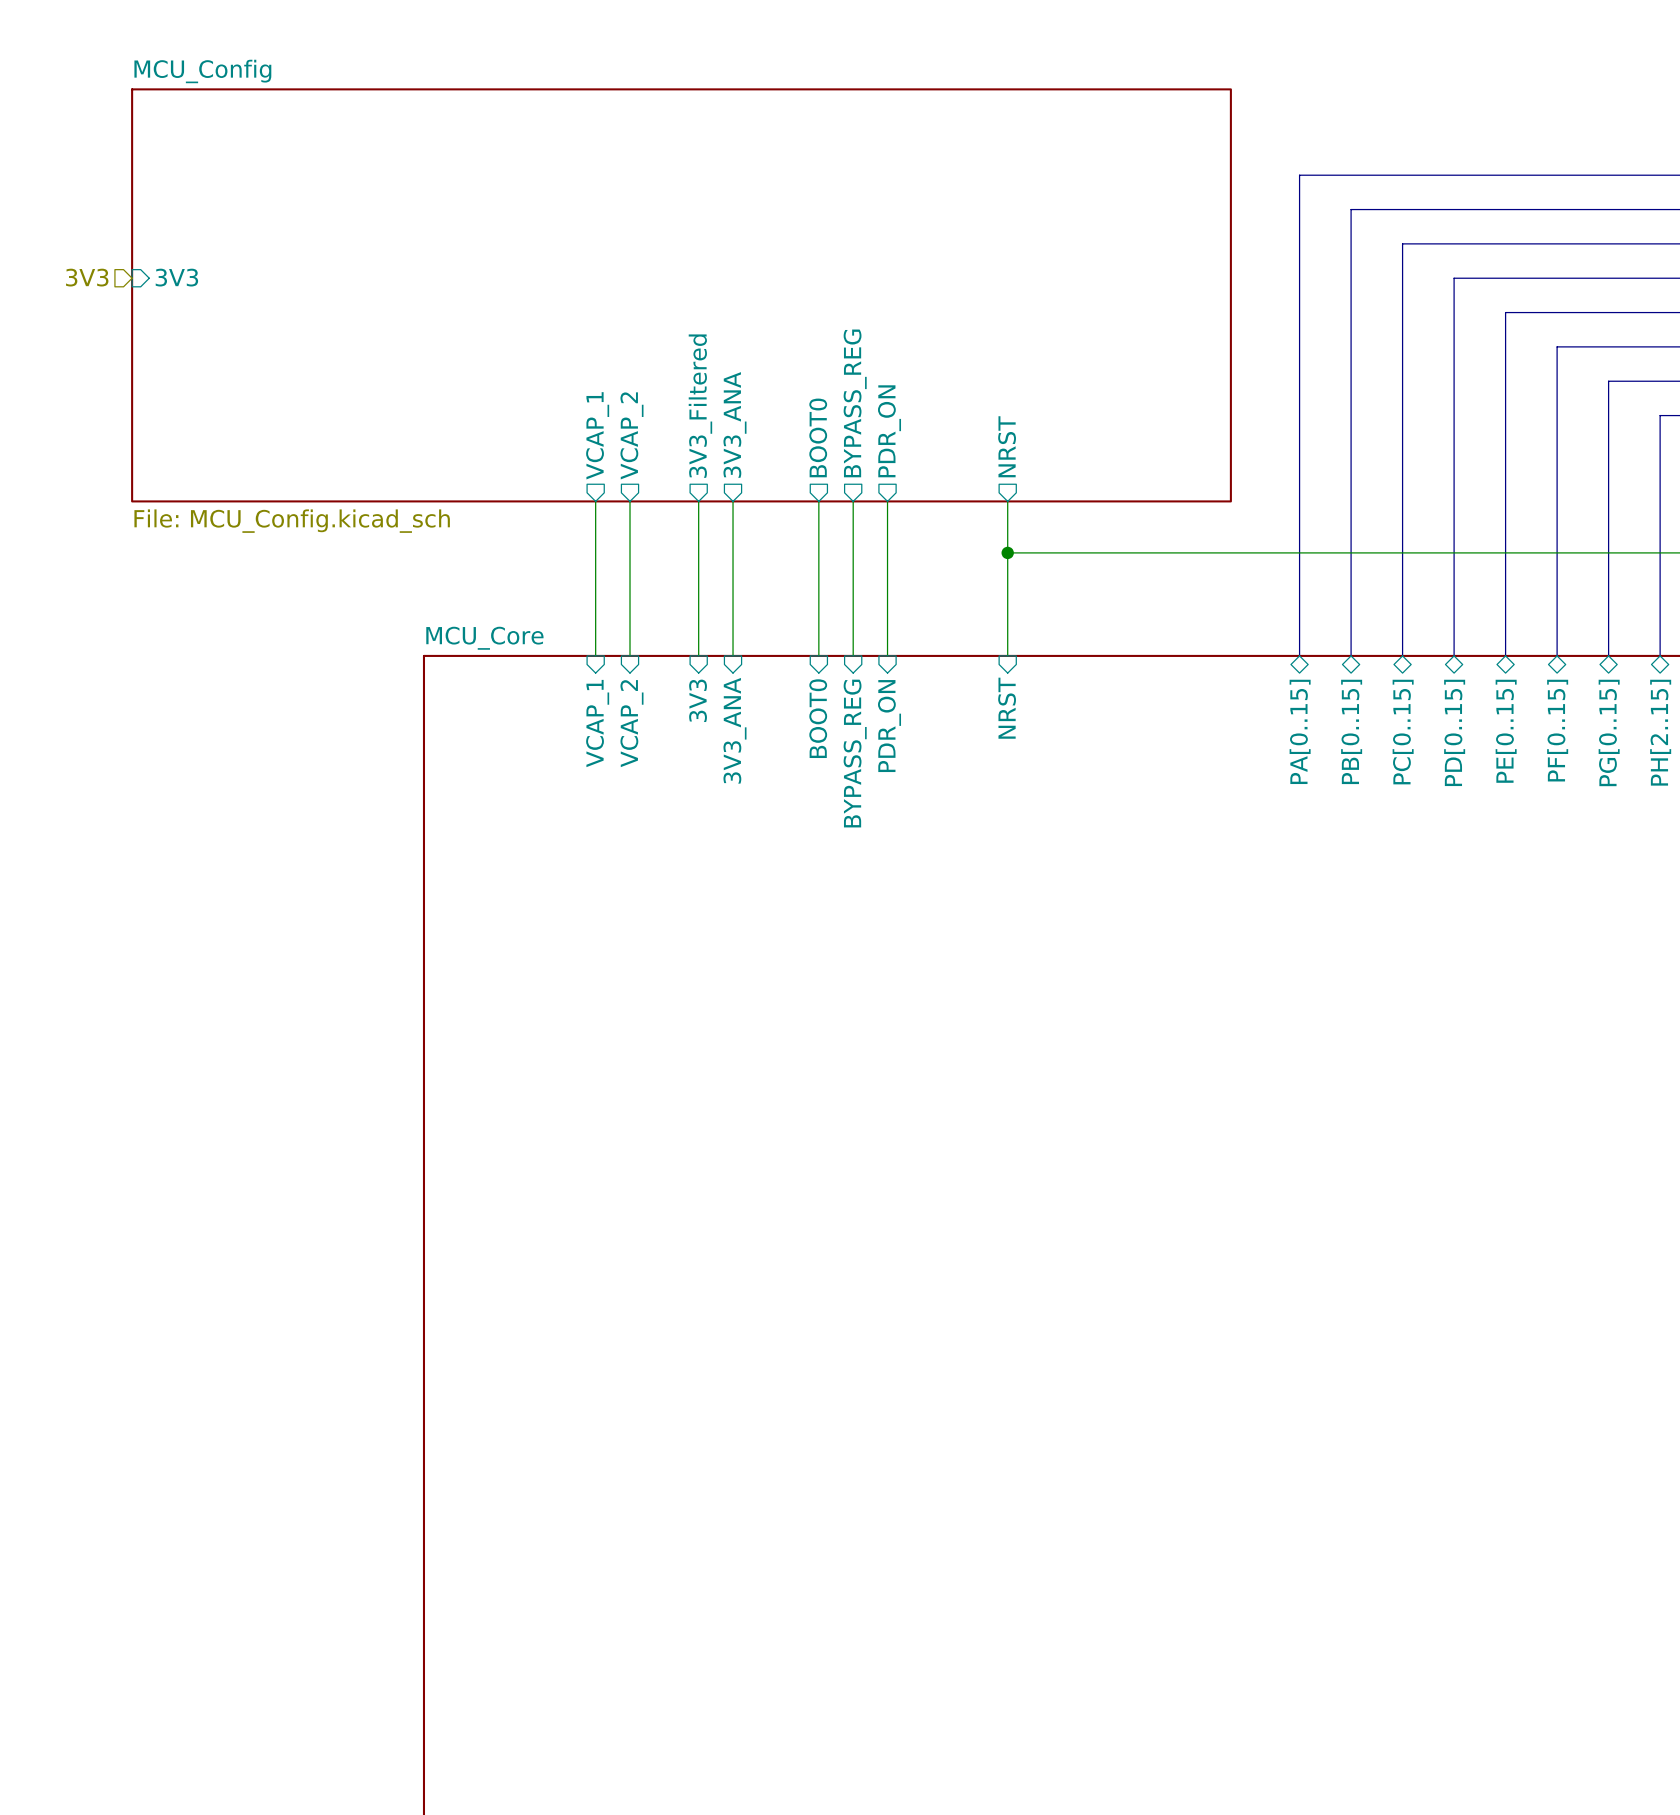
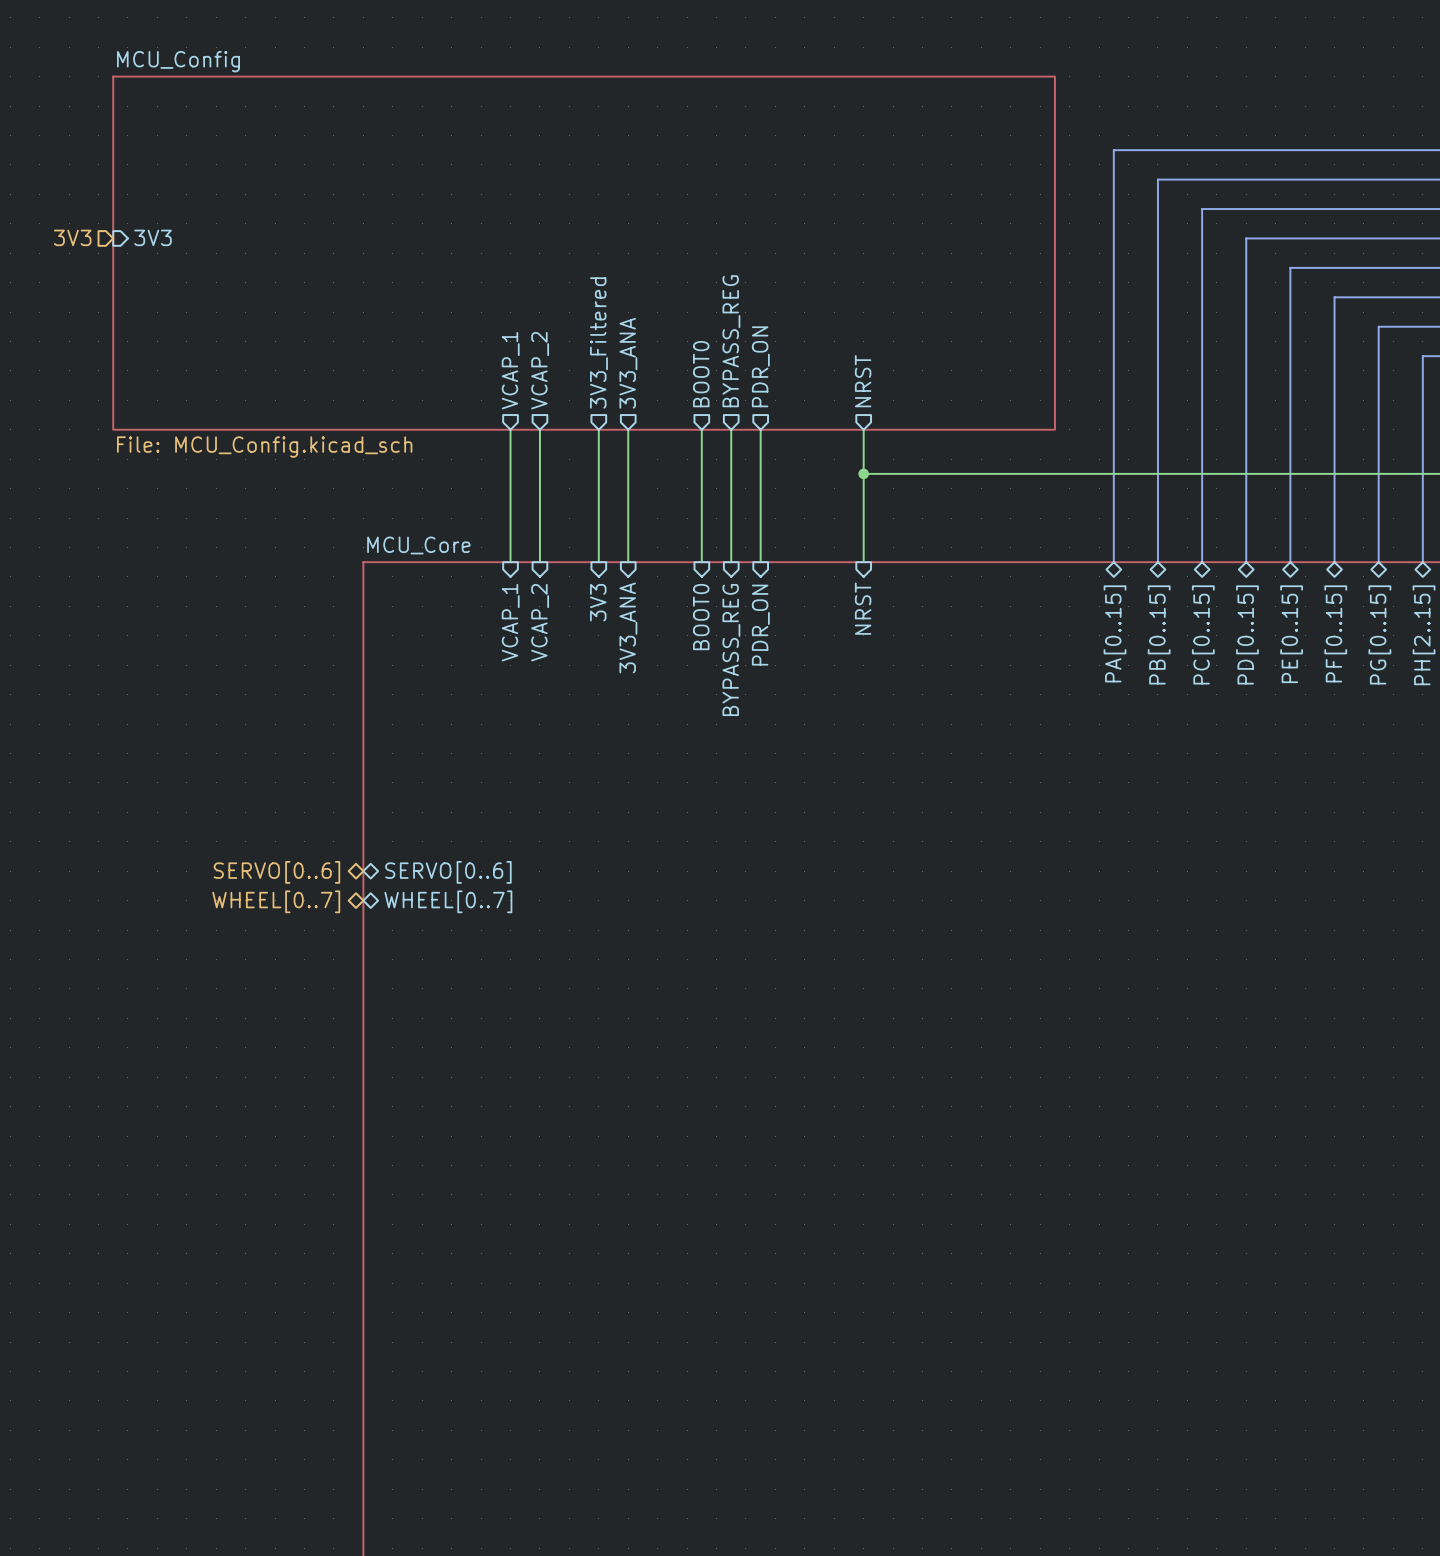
hierarchical label: none -> SERVO[0..6] (276, 872)
sheet pin: none -> SERVO[0..6] (448, 872)
hierarchical label: none -> WHEEL[0..7] (276, 901)
sheet pin: none -> WHEEL[0..7] (448, 901)

